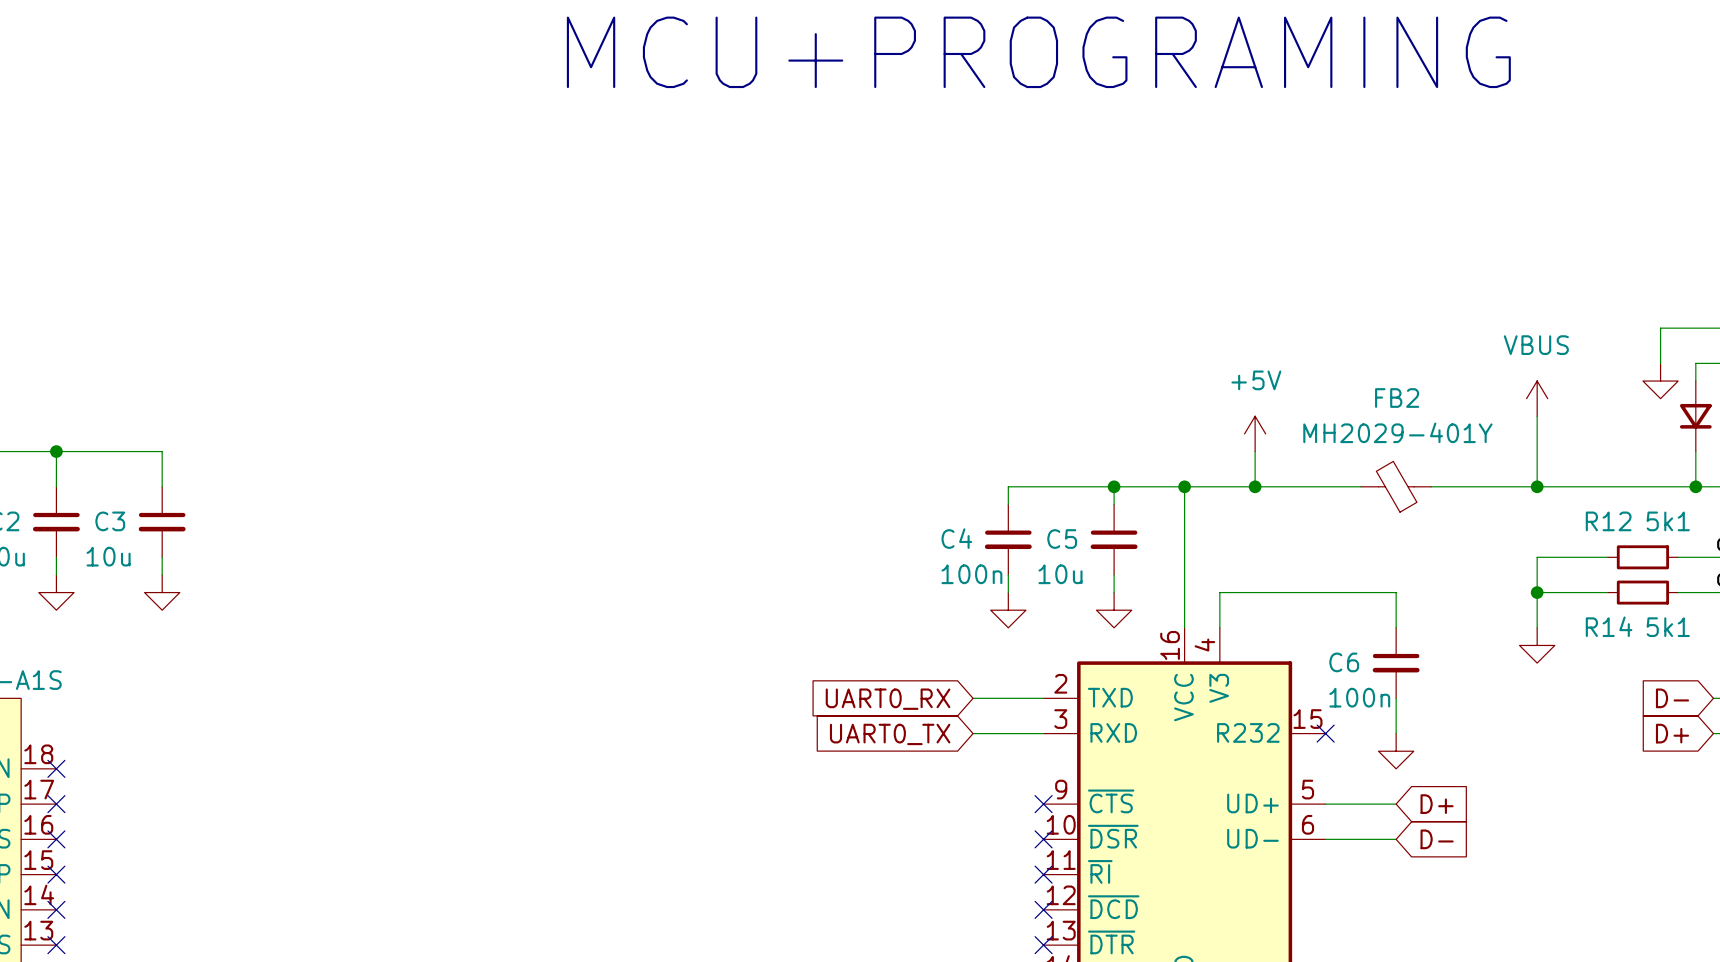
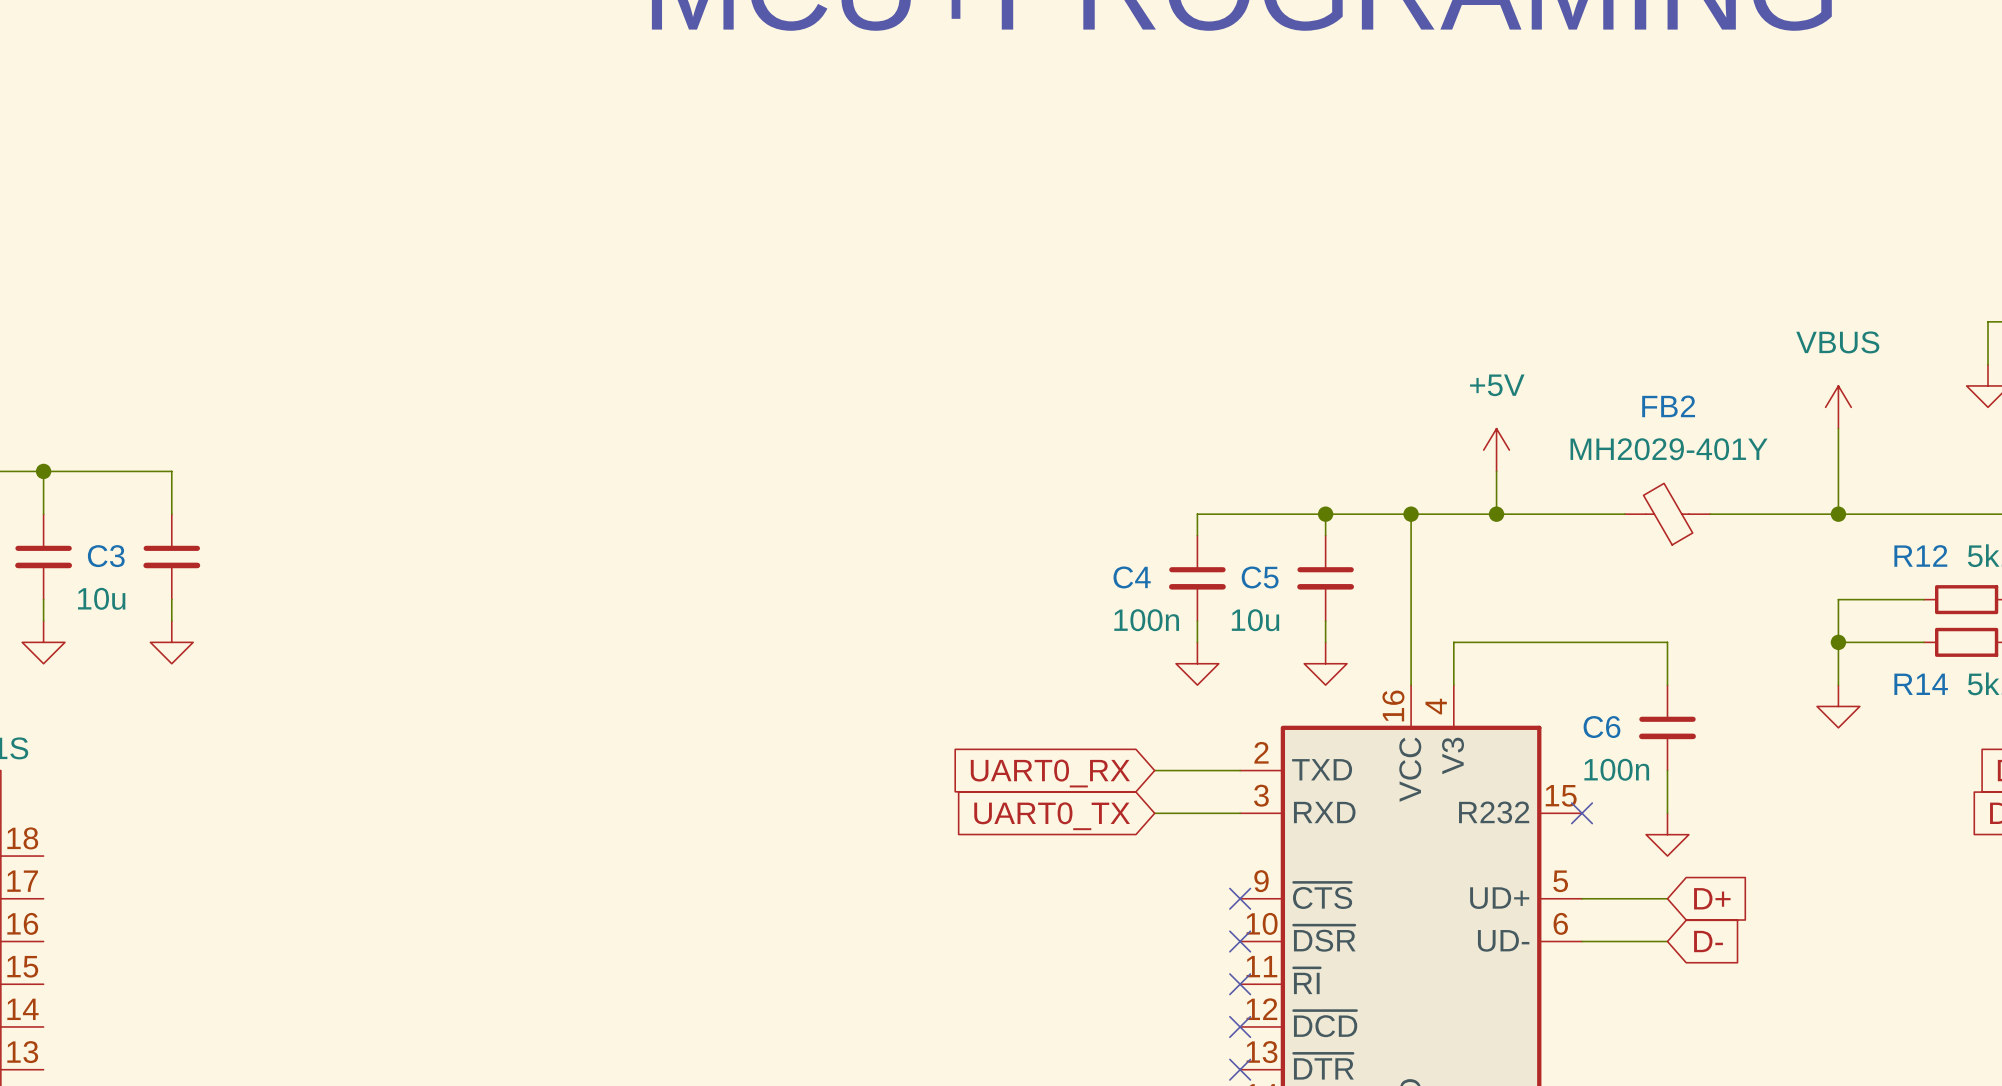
no-connect mark: (56, 768) -> none
no-connect mark: (56, 804) -> none
no-connect mark: (56, 839) -> none
no-connect mark: (56, 874) -> none
no-connect mark: (56, 909) -> none
no-connect mark: (56, 945) -> none

